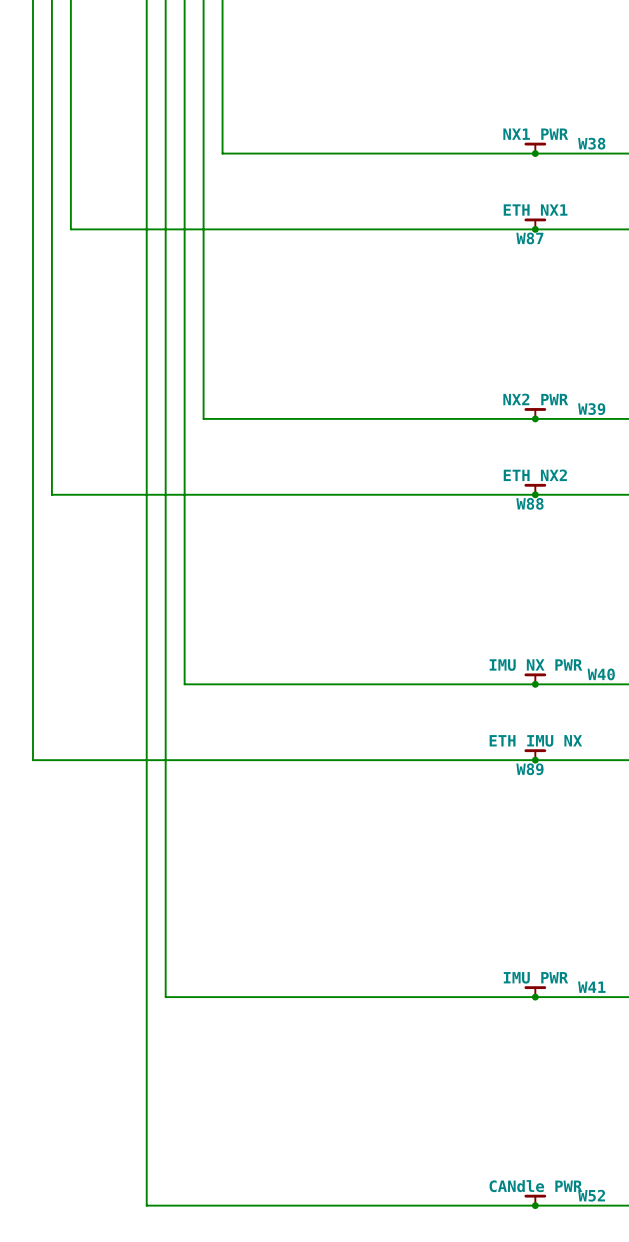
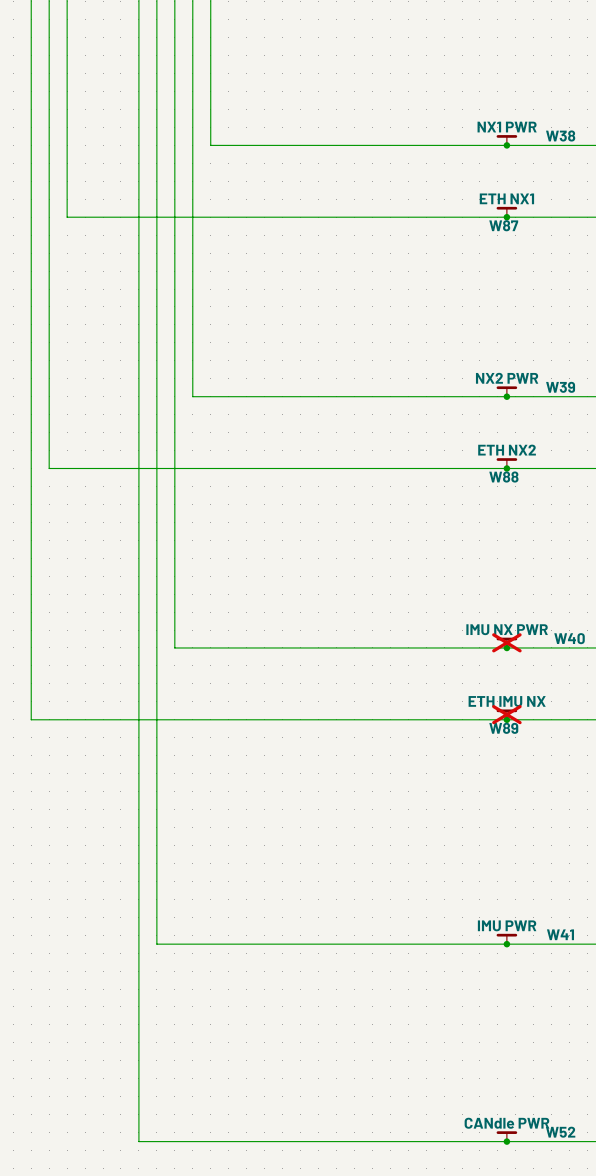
W40 do-not-place cross: none -> (506, 642)
W89 do-not-place cross: none -> (506, 714)

